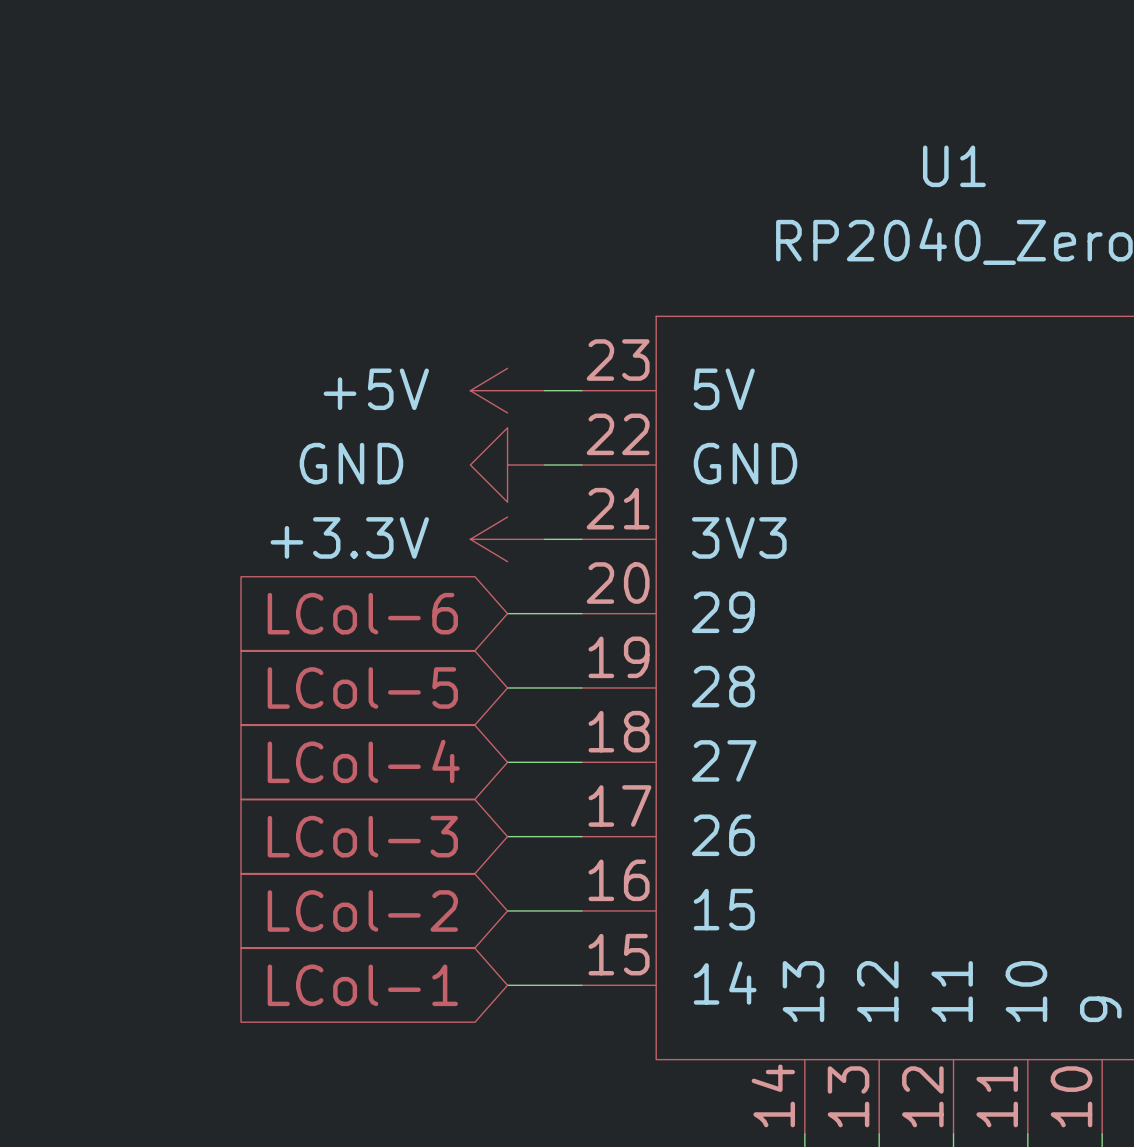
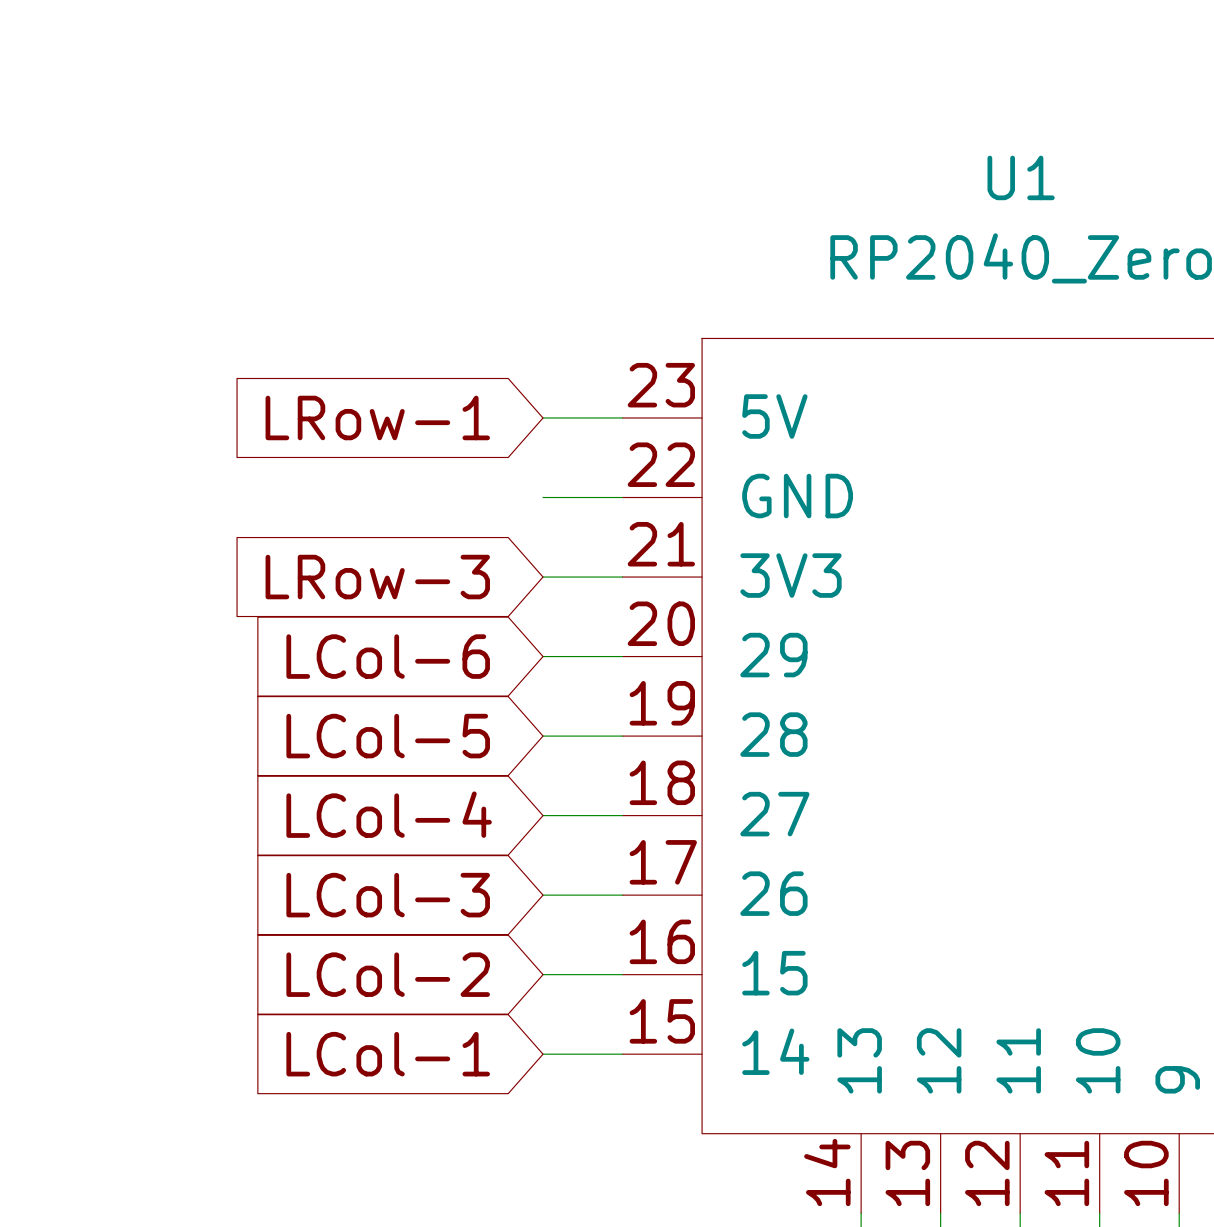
global label: none -> LRow-1 (377, 417)
power symbol: +5V (507, 390) -> none
power symbol: GND (507, 465) -> none
global label: none -> LRow-3 (377, 577)
power symbol: +3.3V (507, 539) -> none

